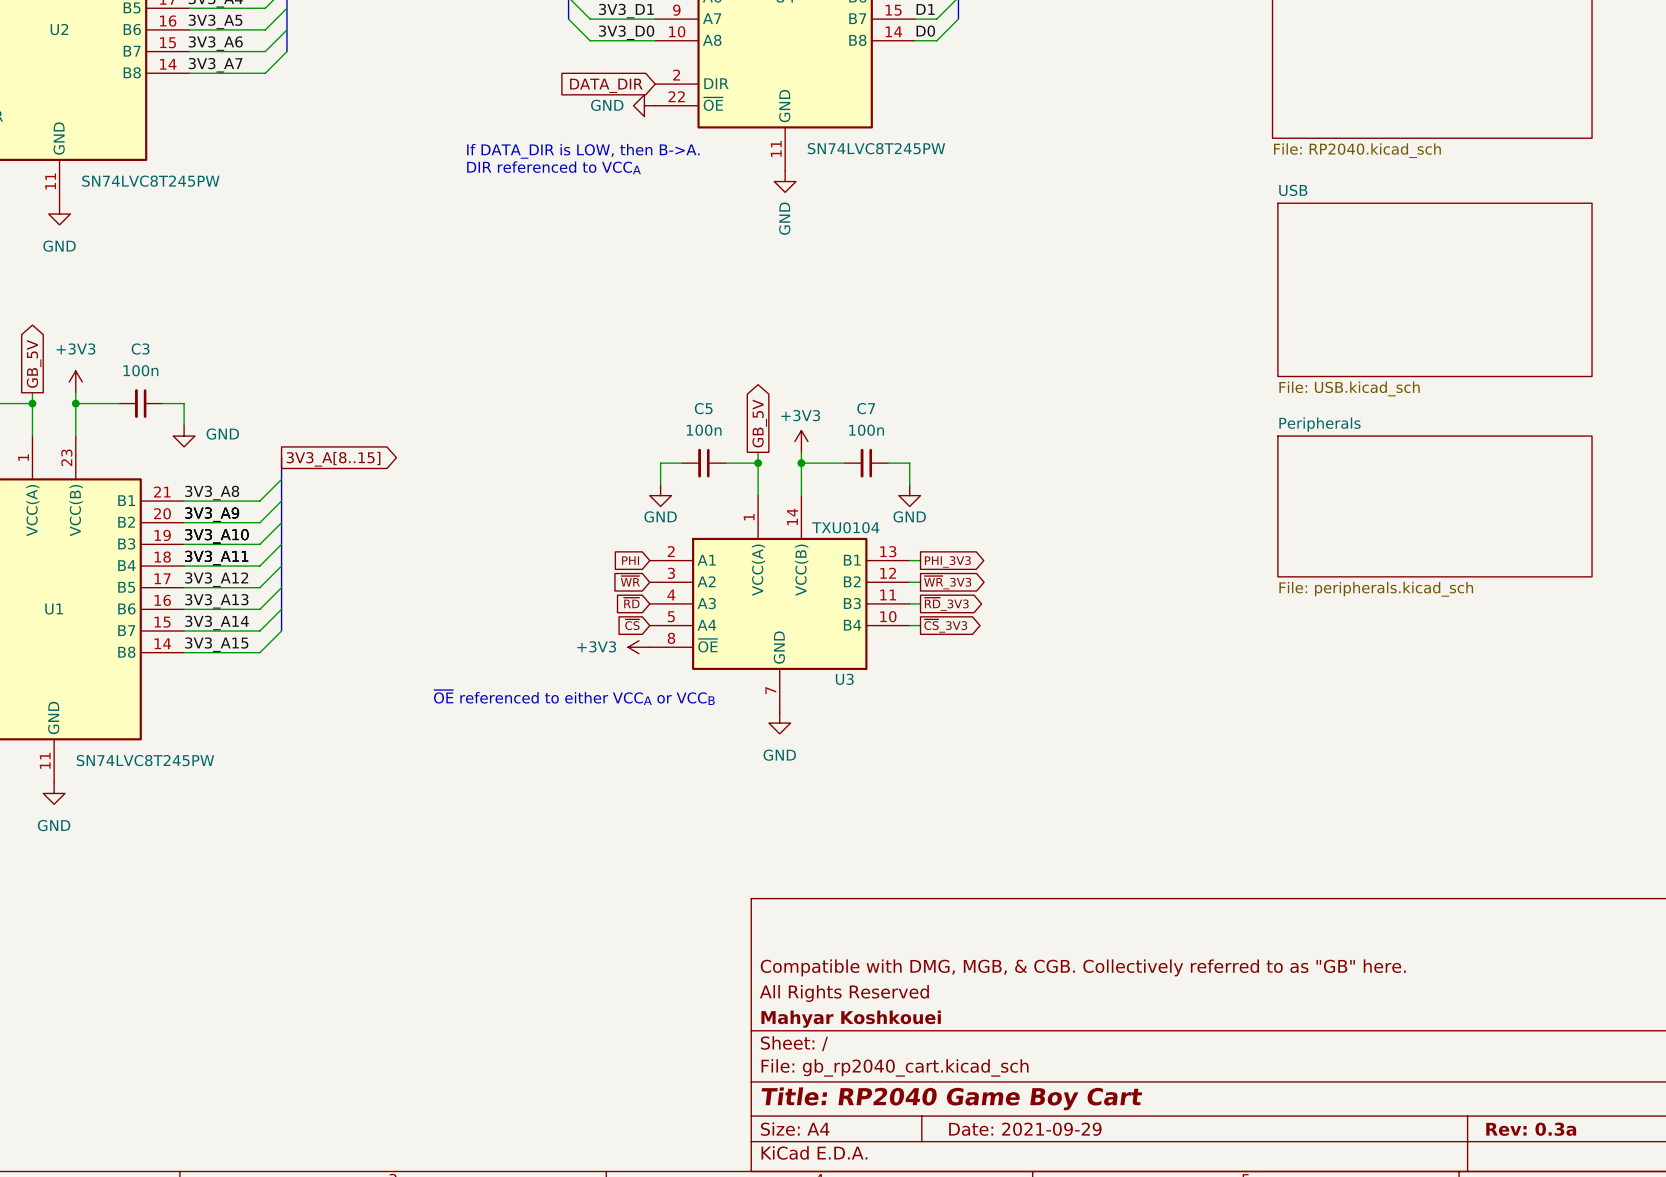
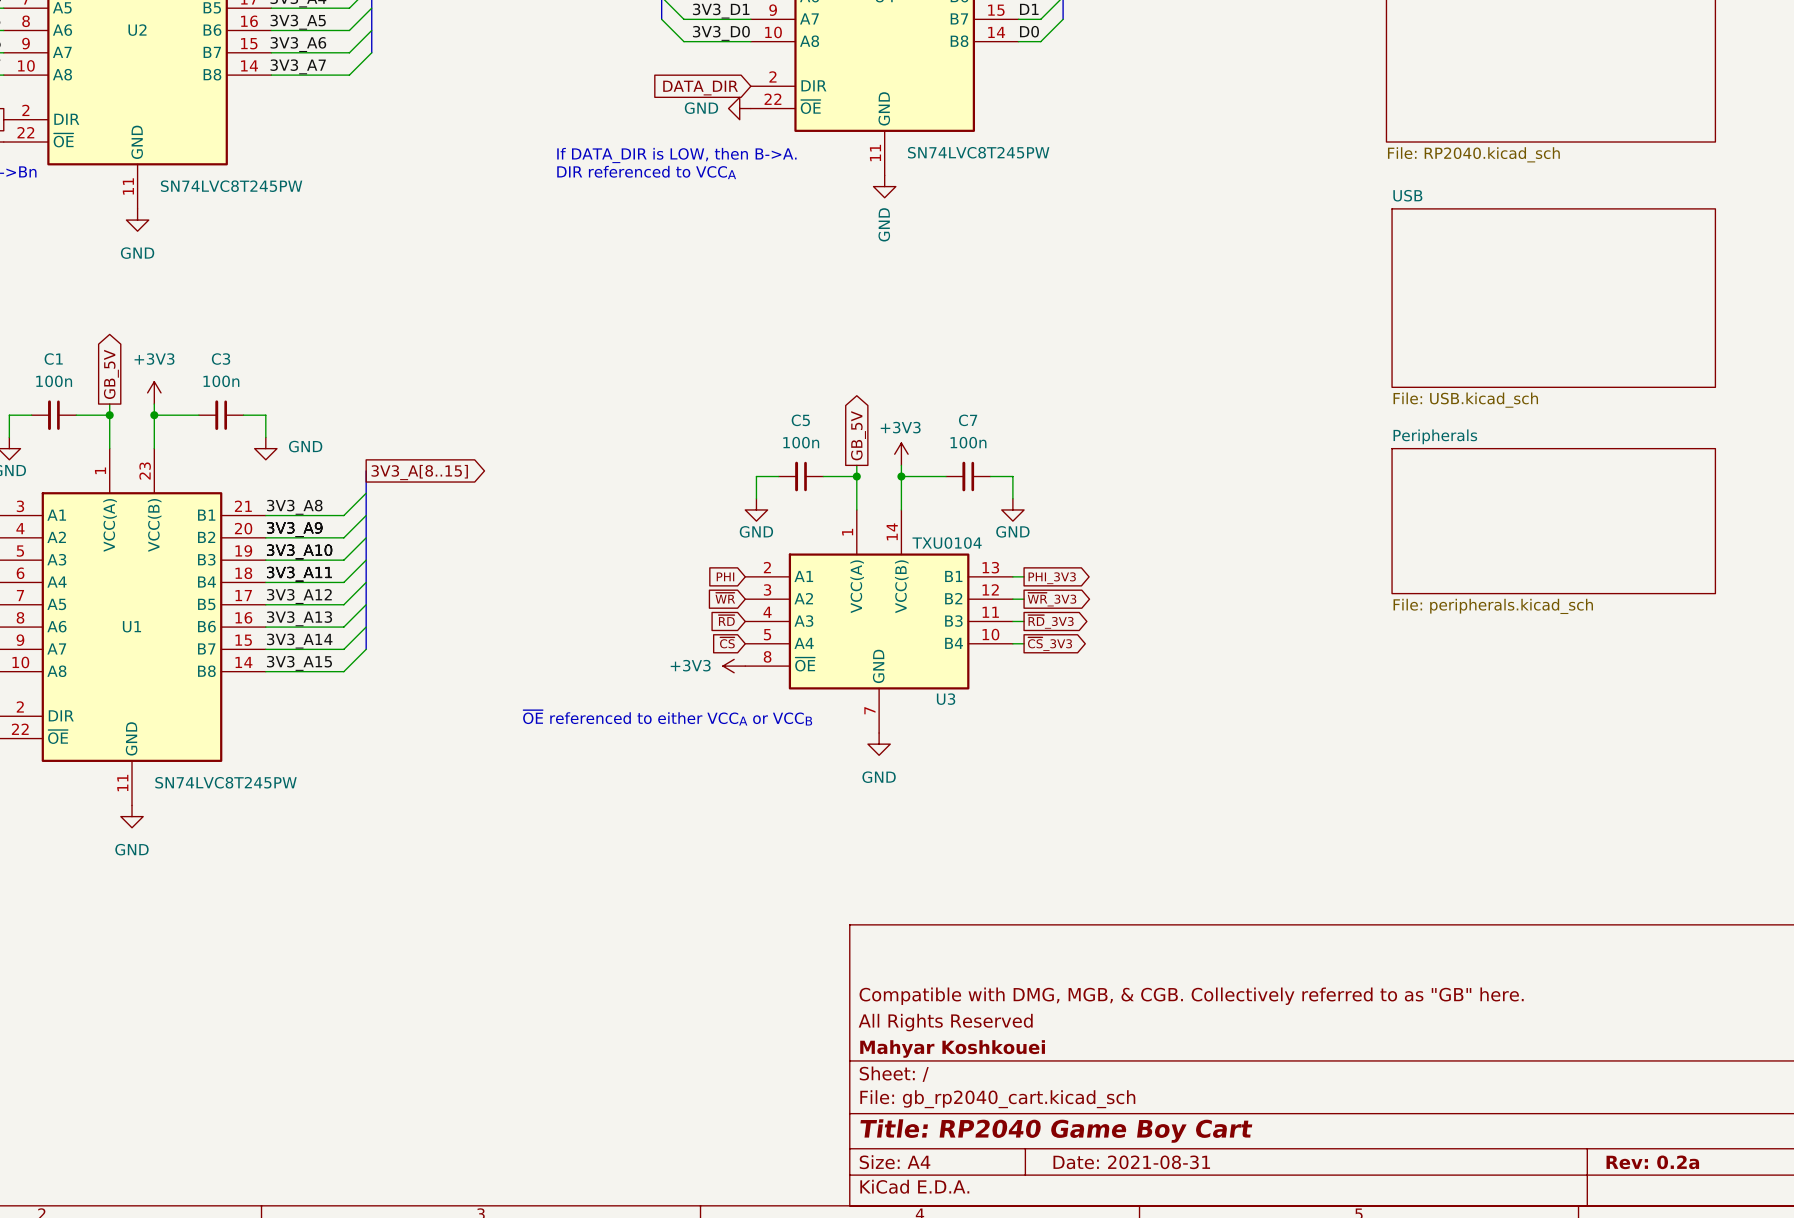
title block: Date: 2021-09-29 (1025, 1129) -> Date: 2021-08-31 (1131, 1162)
title block: Rev: 0.3a (1531, 1129) -> Rev: 0.2a (1652, 1162)

